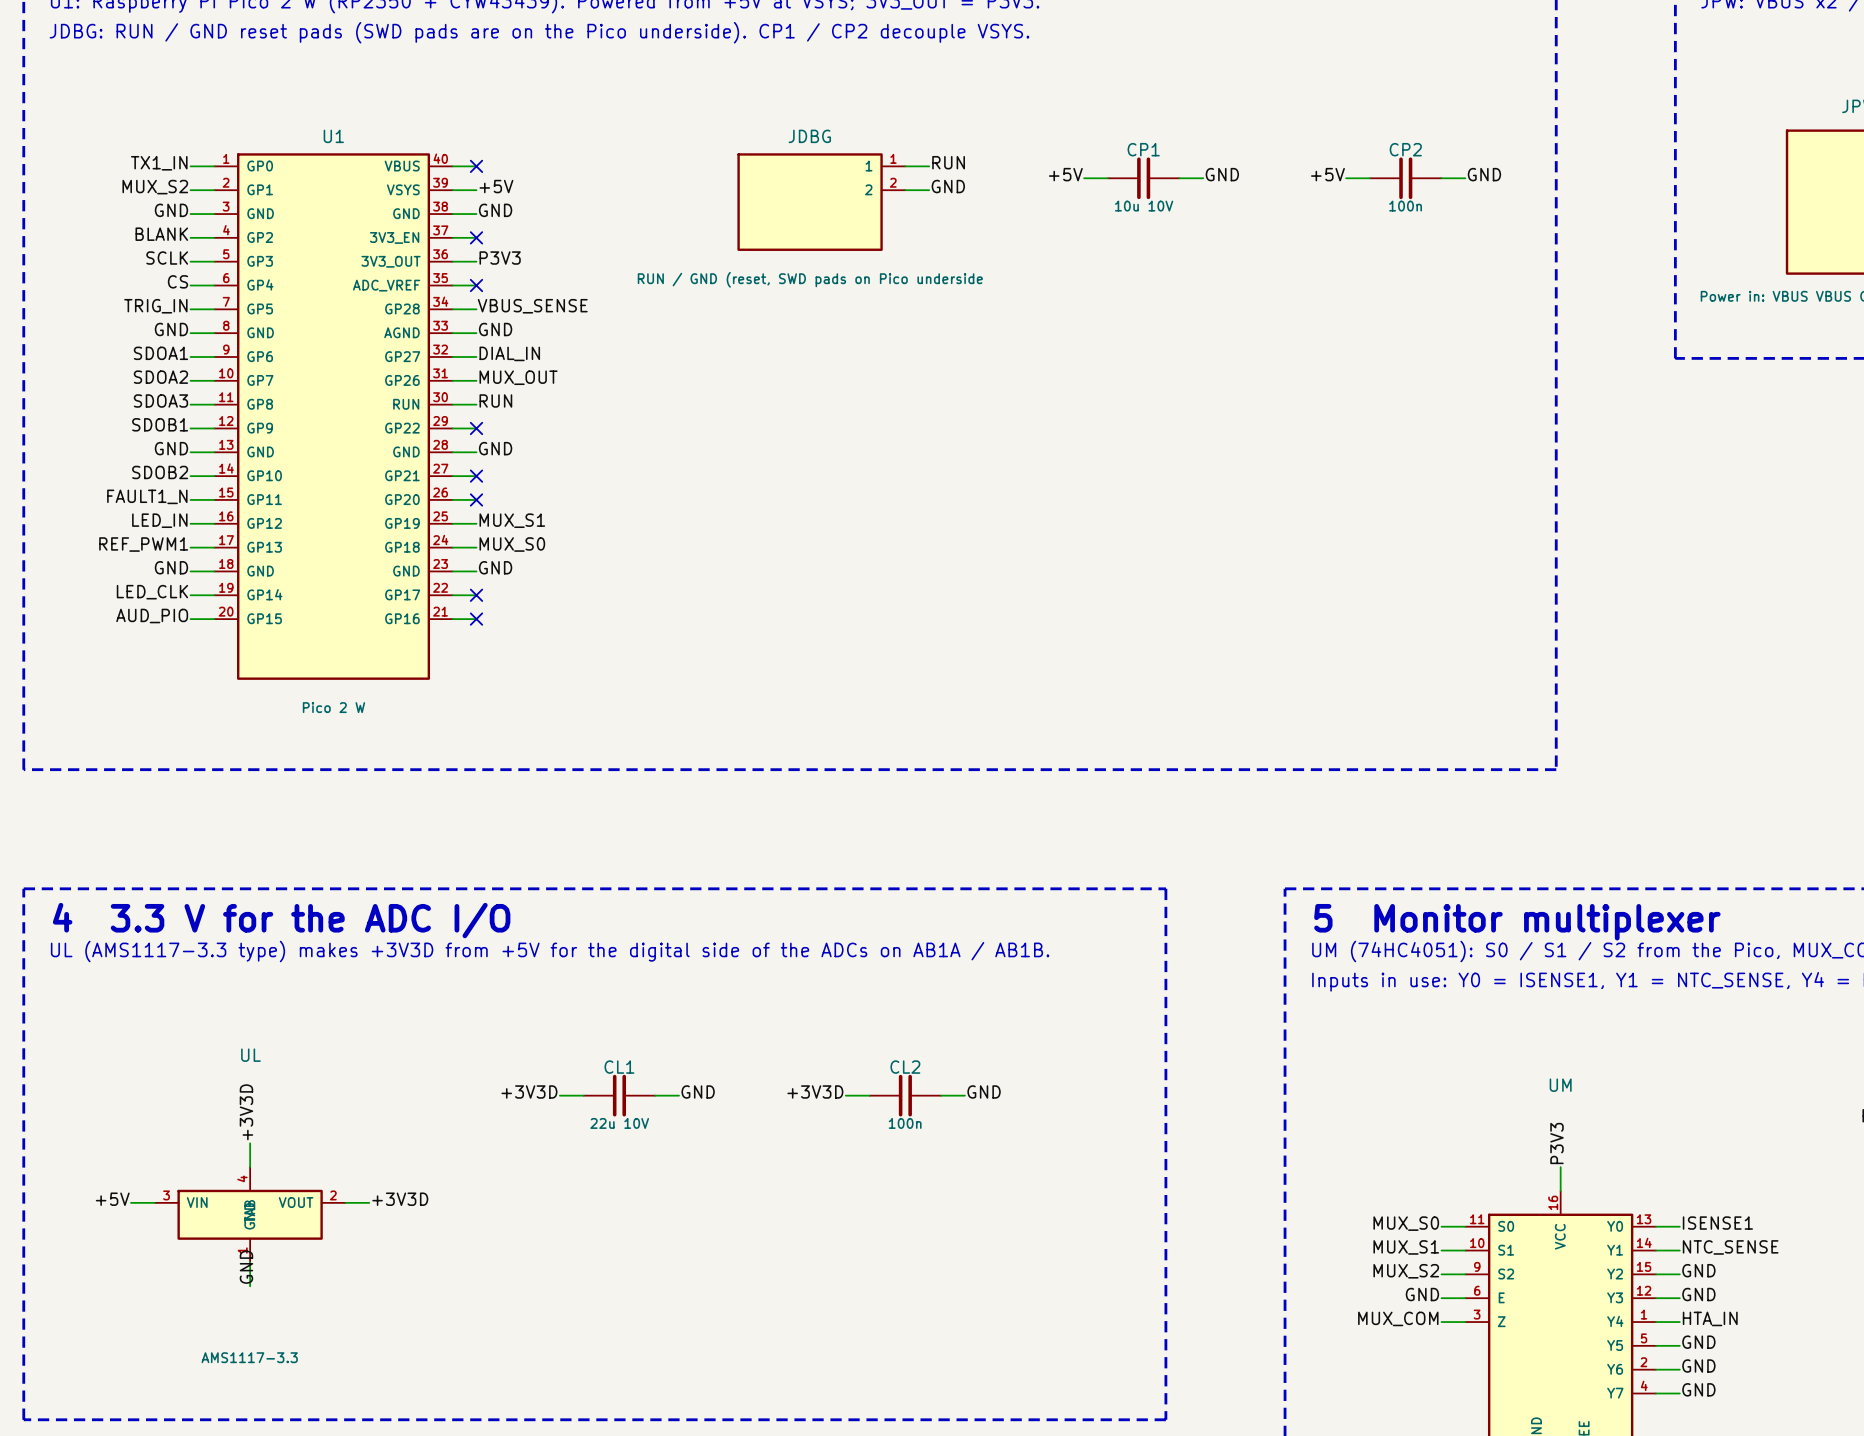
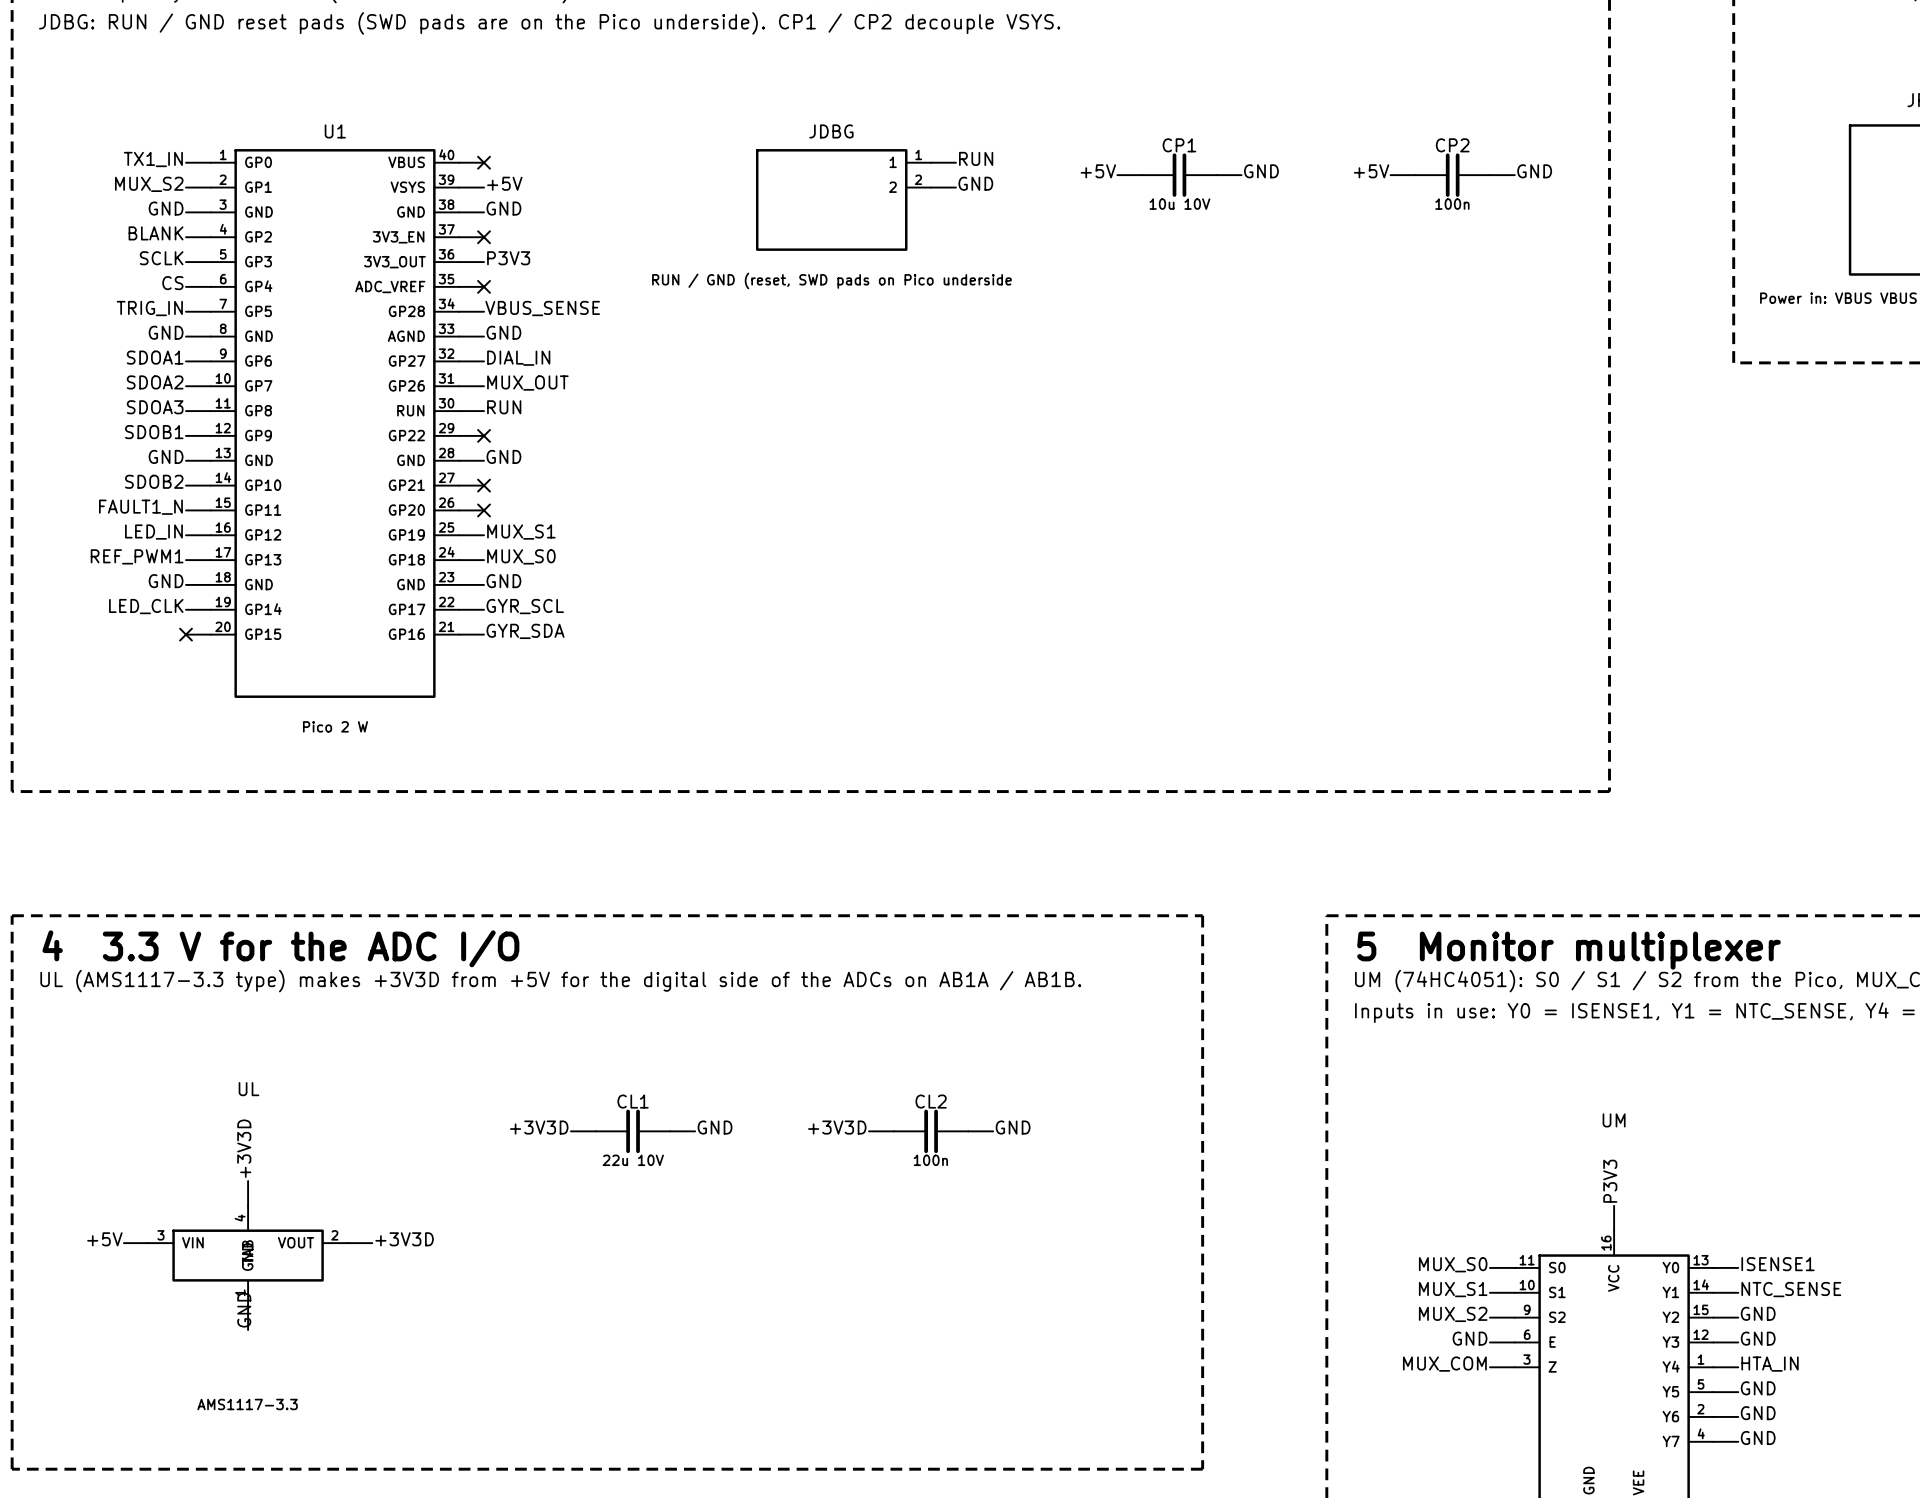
label: none -> GYR_SCL (525, 606)
no-connect mark: (476, 595) -> none
label: AUD_PIO (152, 616) -> none
label: none -> GYR_SDA (525, 631)
no-connect mark: none -> (185, 634)
no-connect mark: (476, 619) -> none

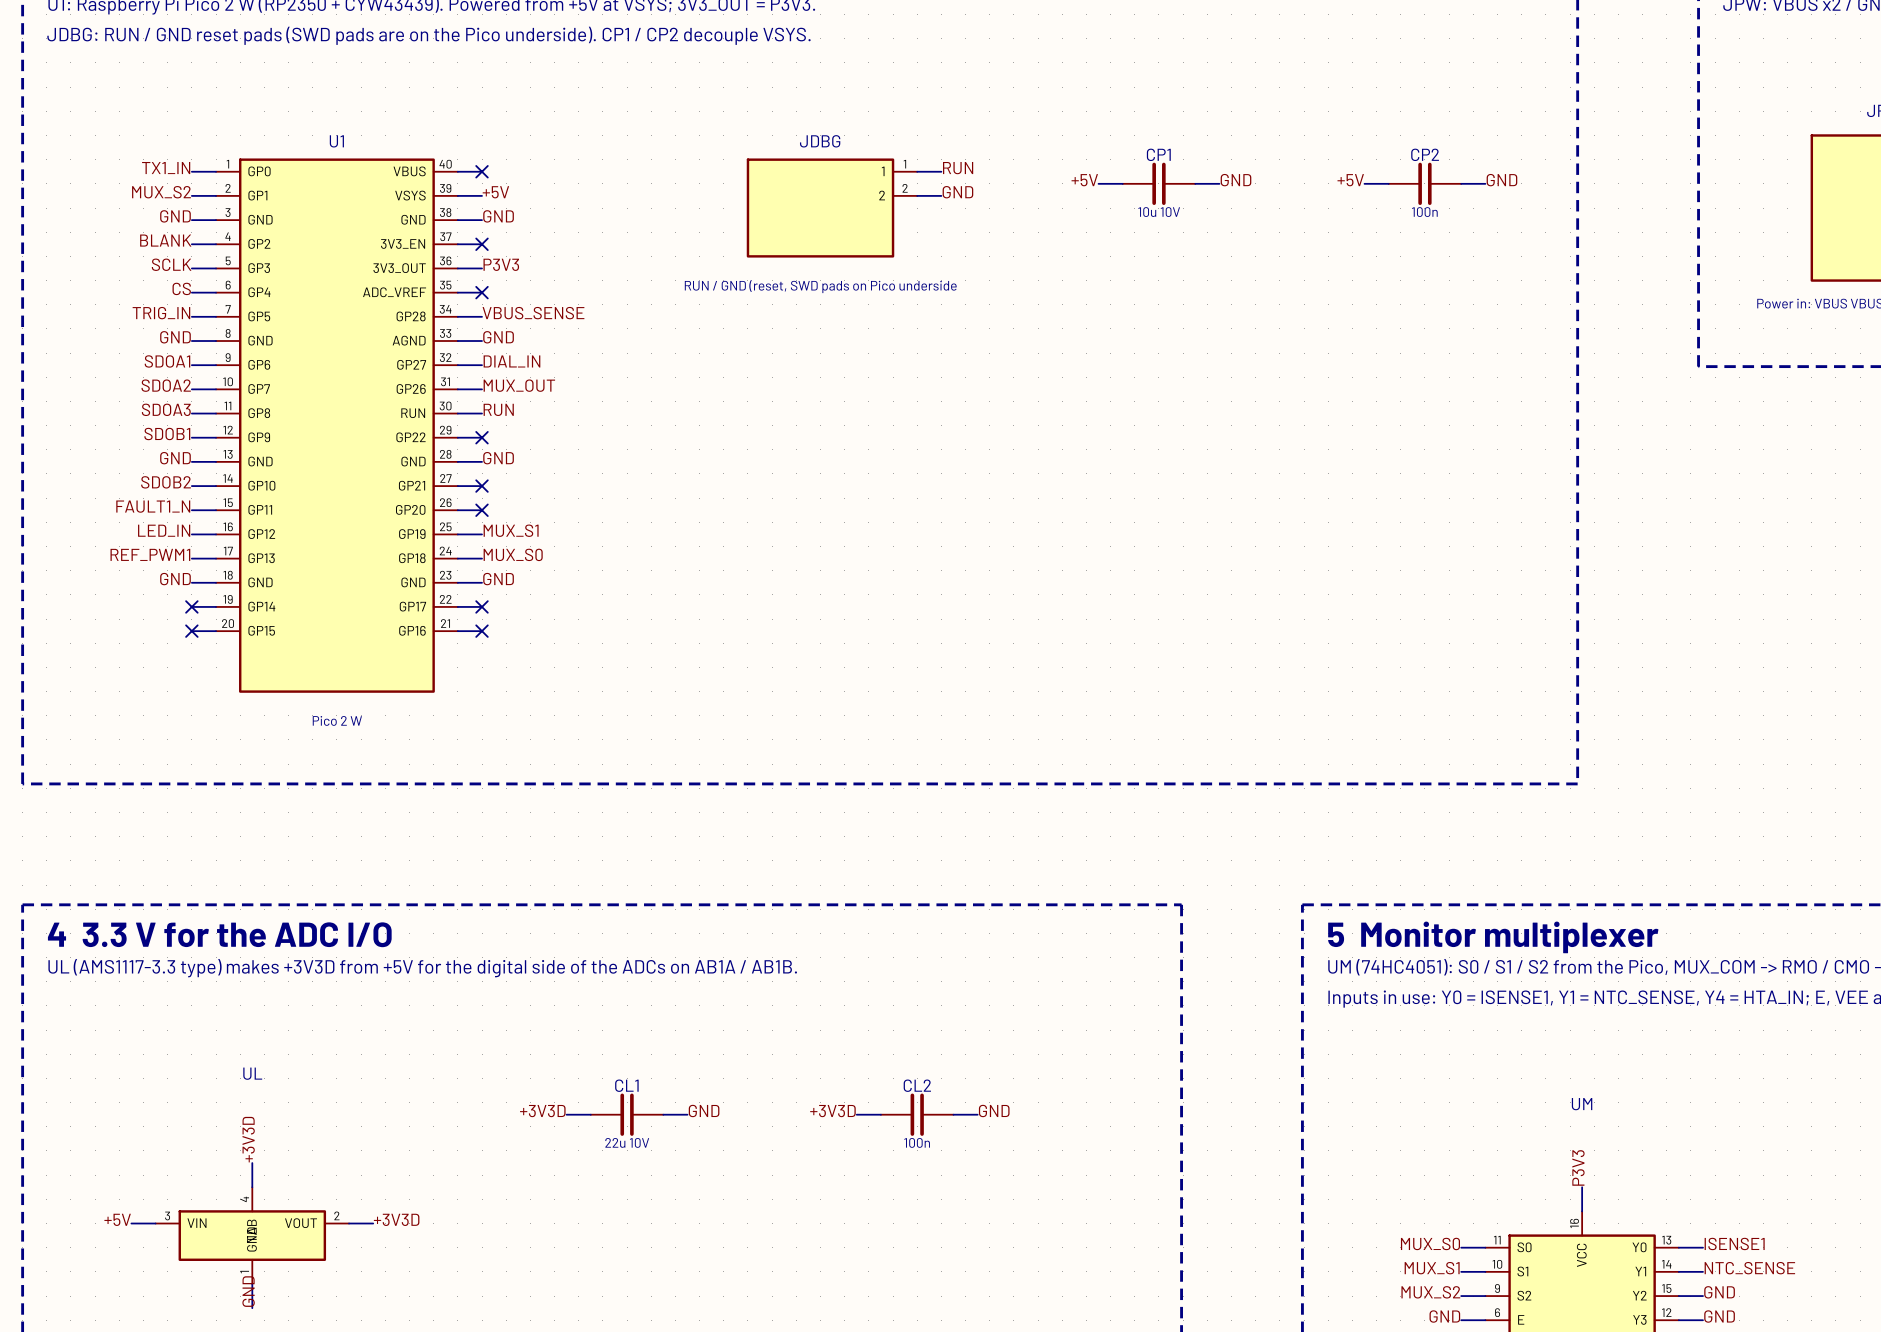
label: LED_CLK (146, 606) -> none
label: GYR_SCL (525, 606) -> none
no-connect mark: none -> (191, 606)
no-connect mark: none -> (482, 606)
label: GYR_SDA (525, 631) -> none
no-connect mark: none -> (482, 631)

